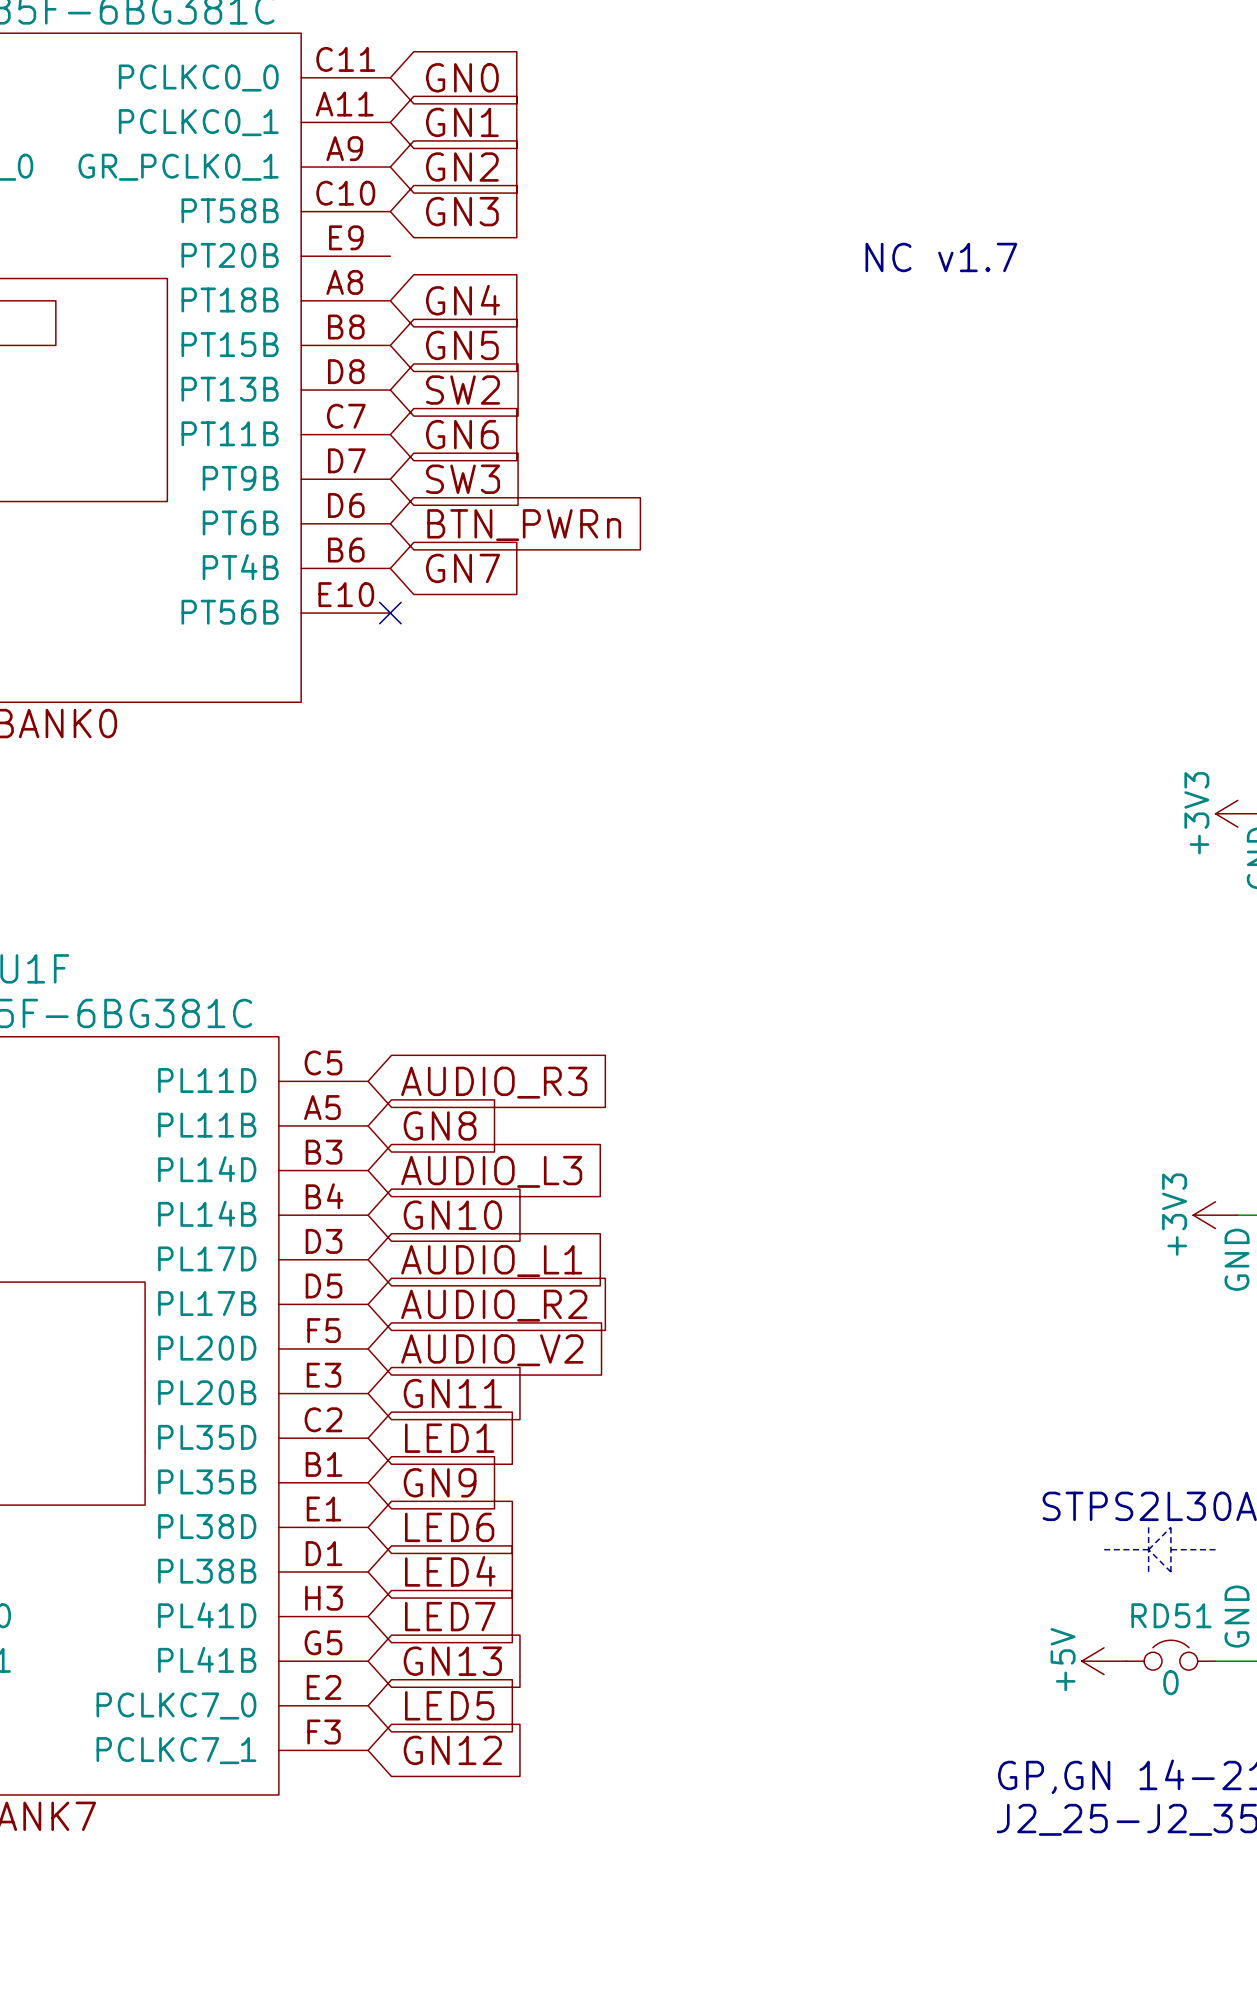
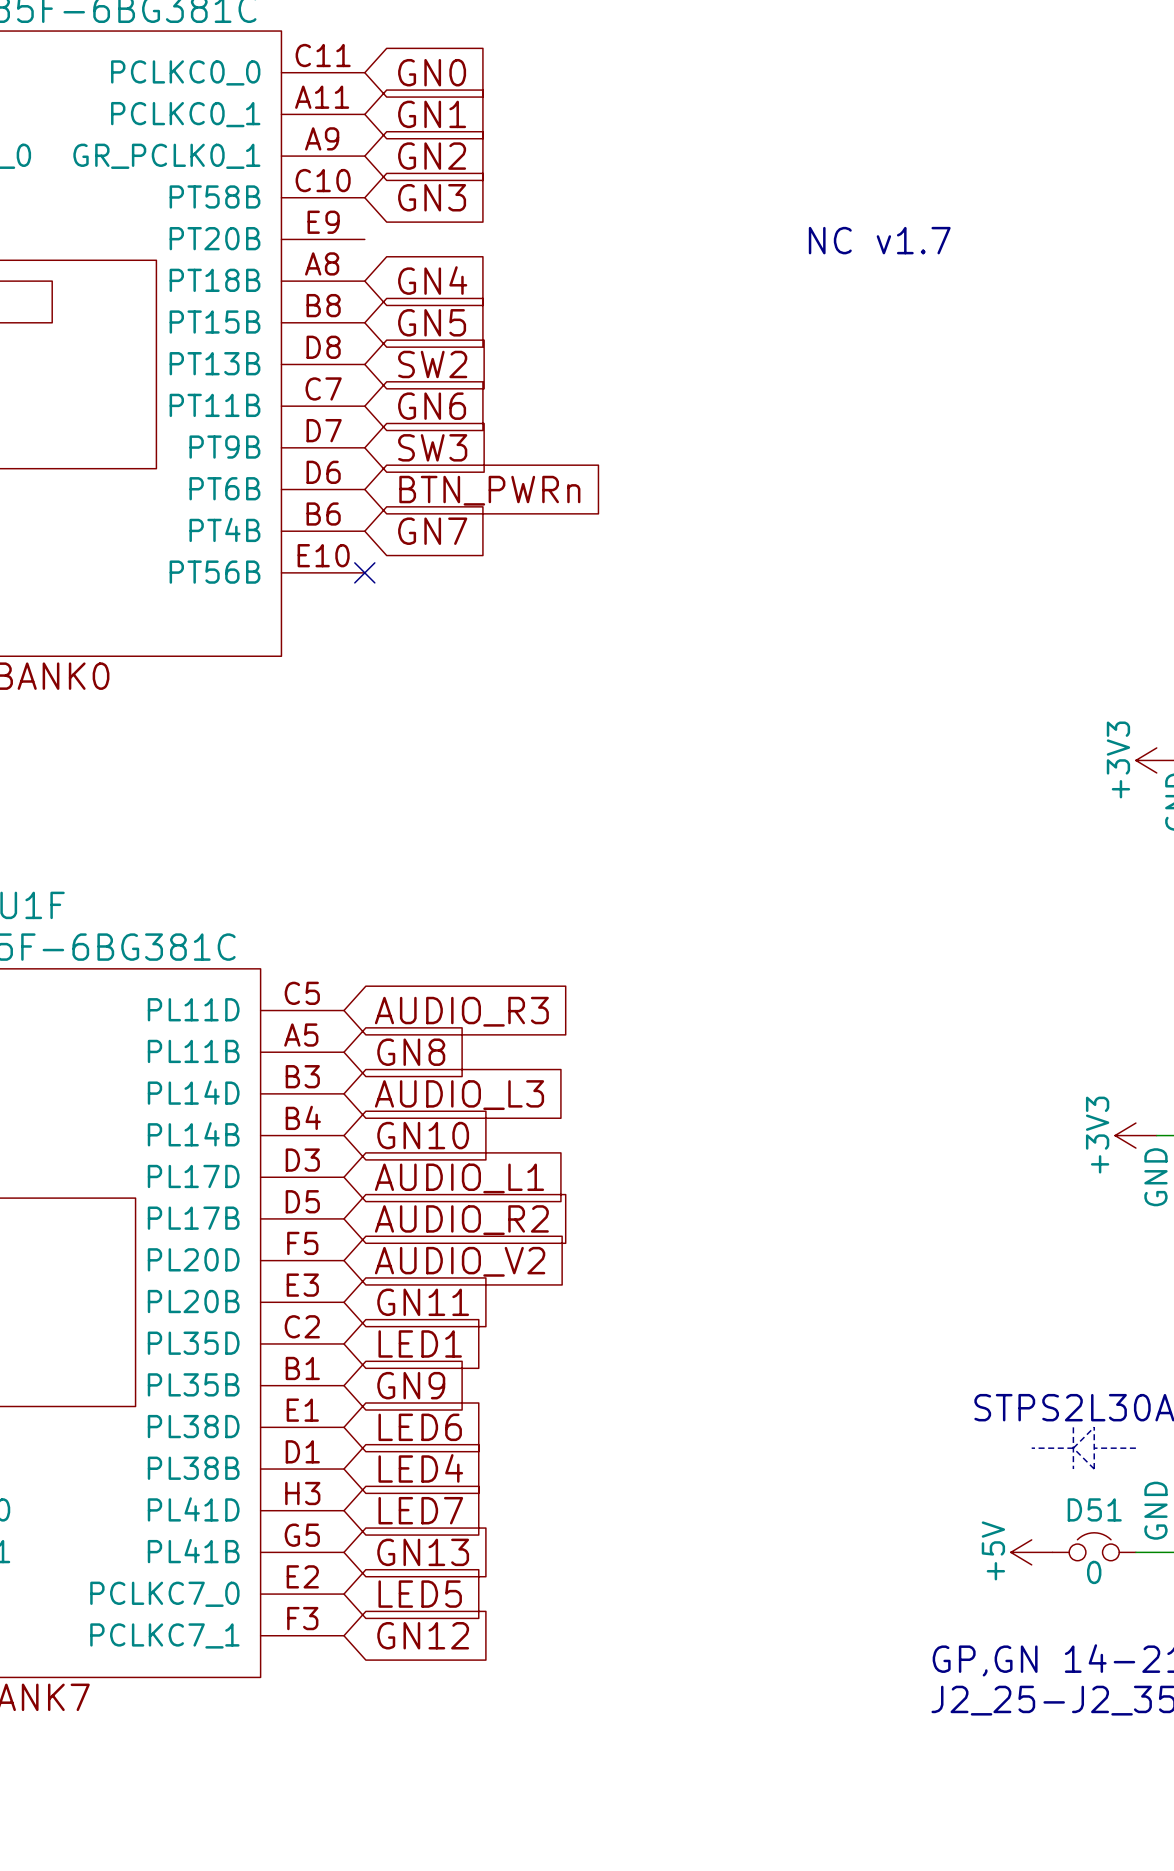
RD51 name: RD51 (1171, 1615) -> D51 (1094, 1509)

